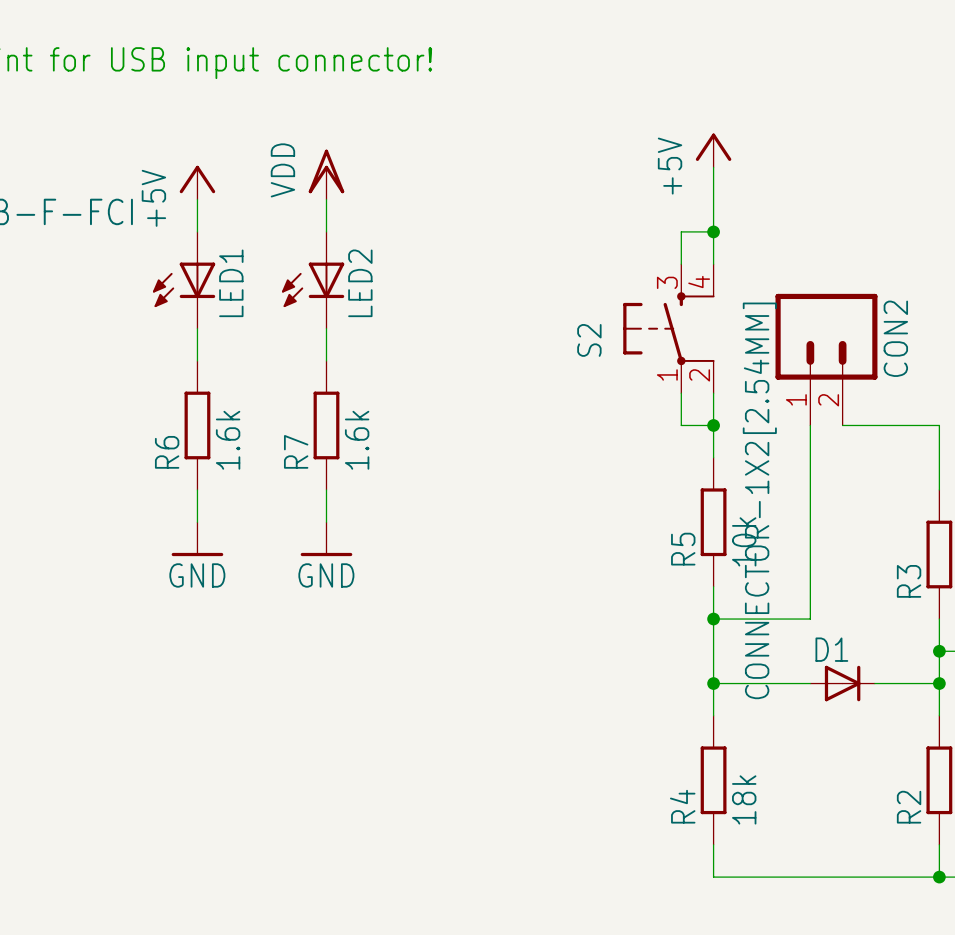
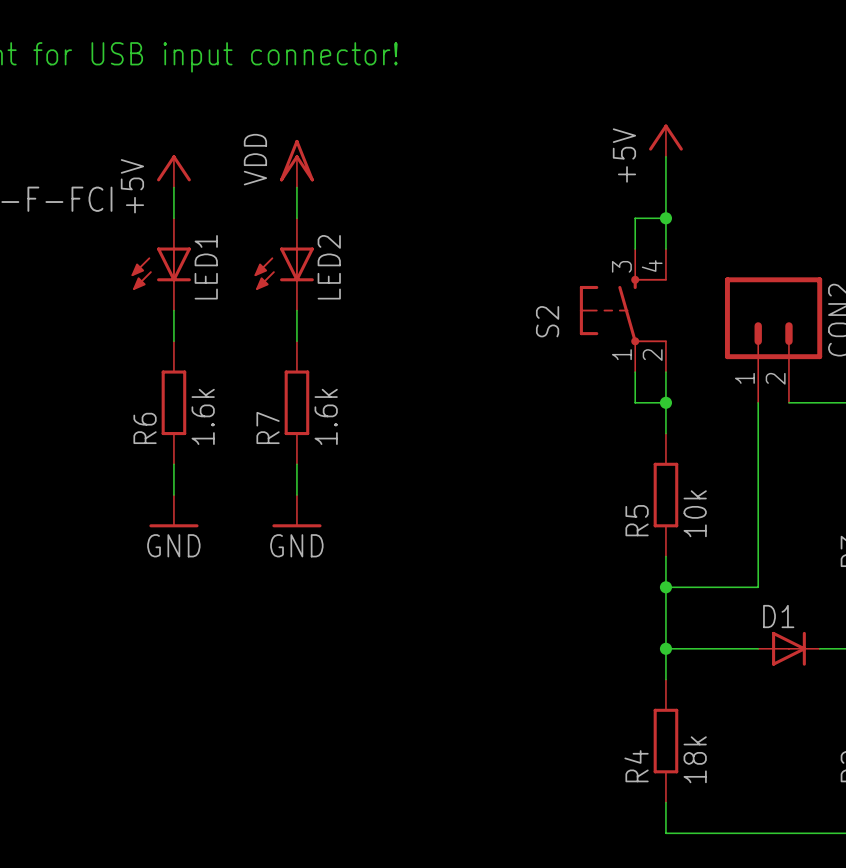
CON2 value: CONNECTOR-1X2[2.54MM] (759, 500) -> none

